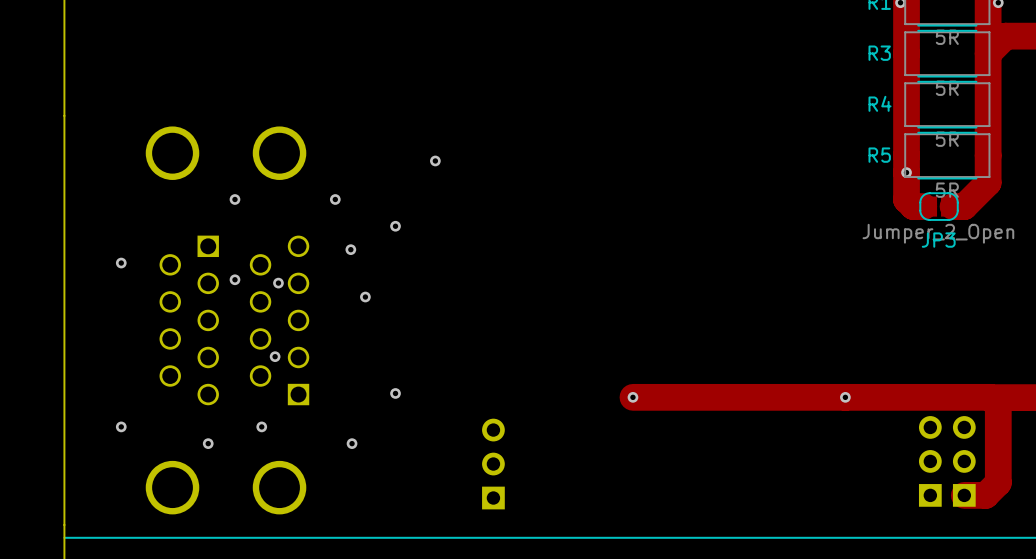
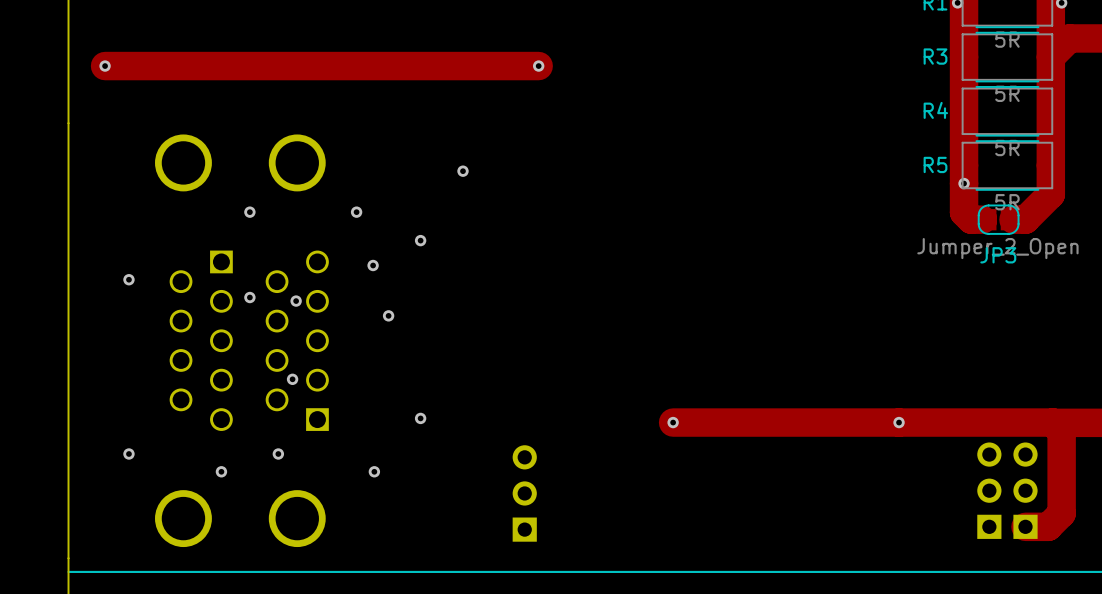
track: none -> (105, 66) (538, 66)
via: none -> (105, 66)
via: none -> (538, 66)

